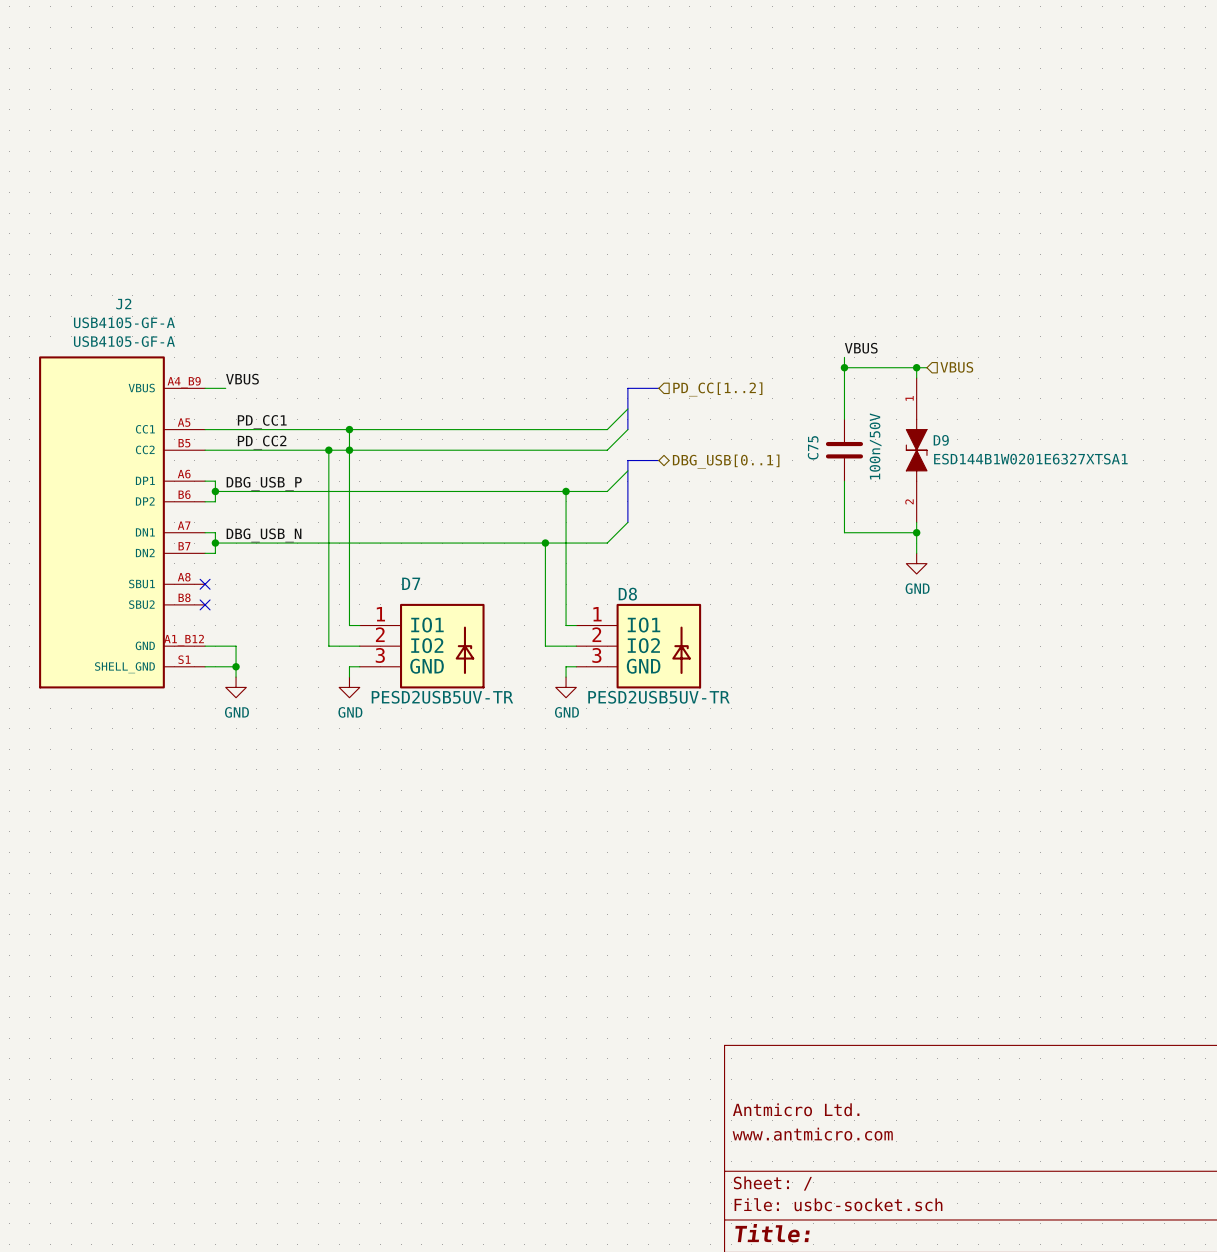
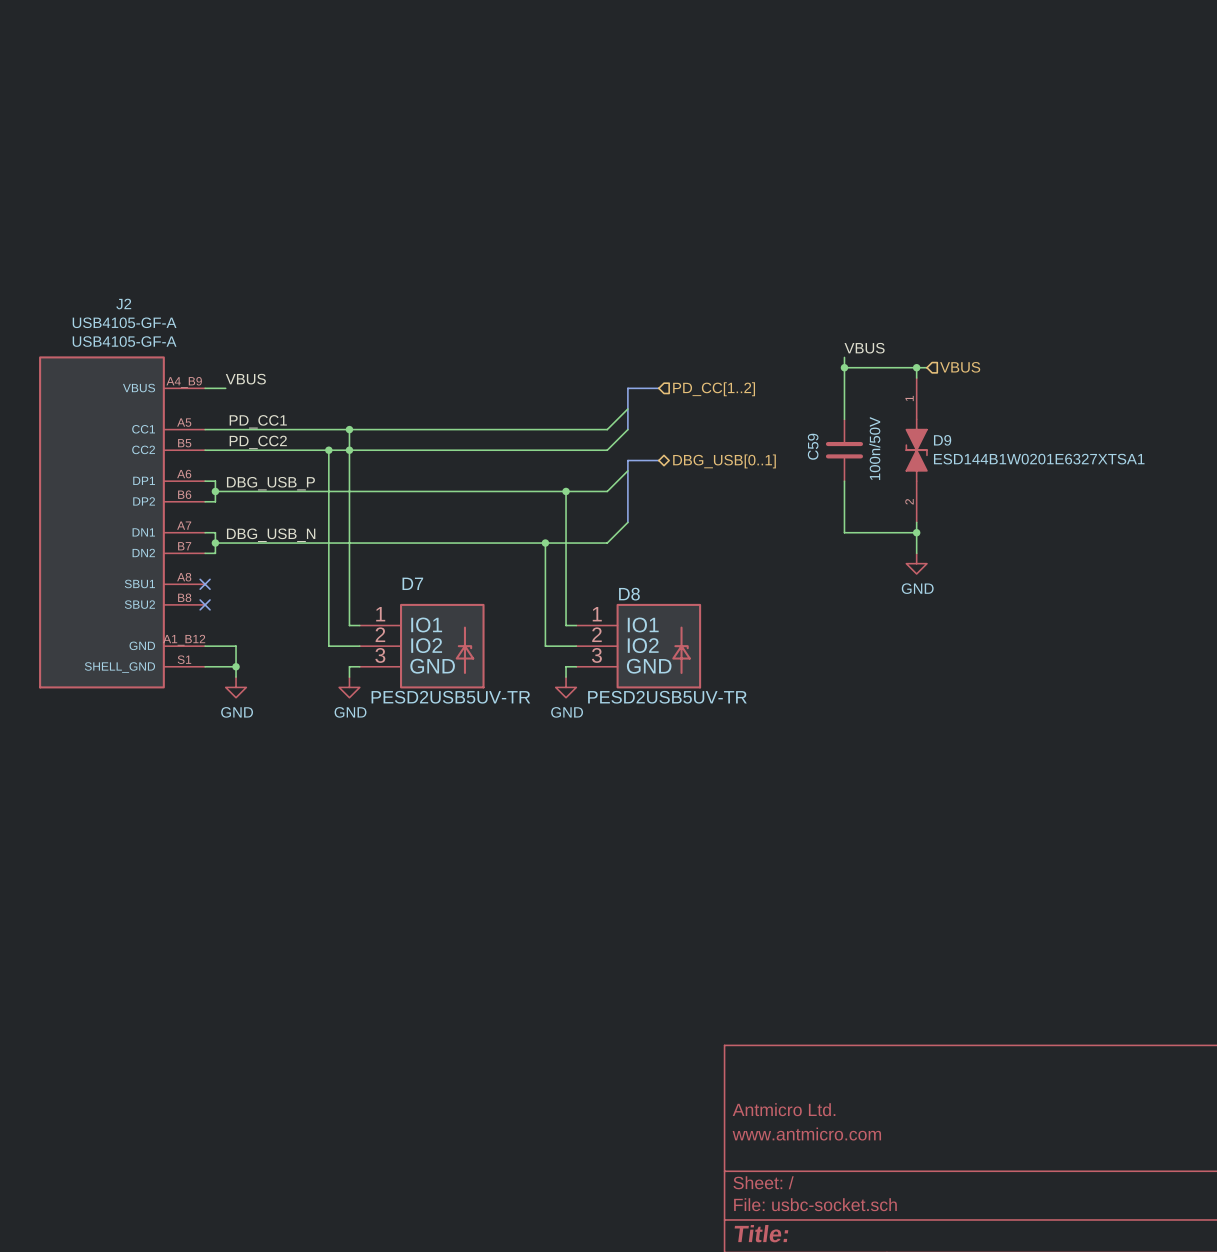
C75 name: C75 (813, 447) -> C59 (813, 446)

